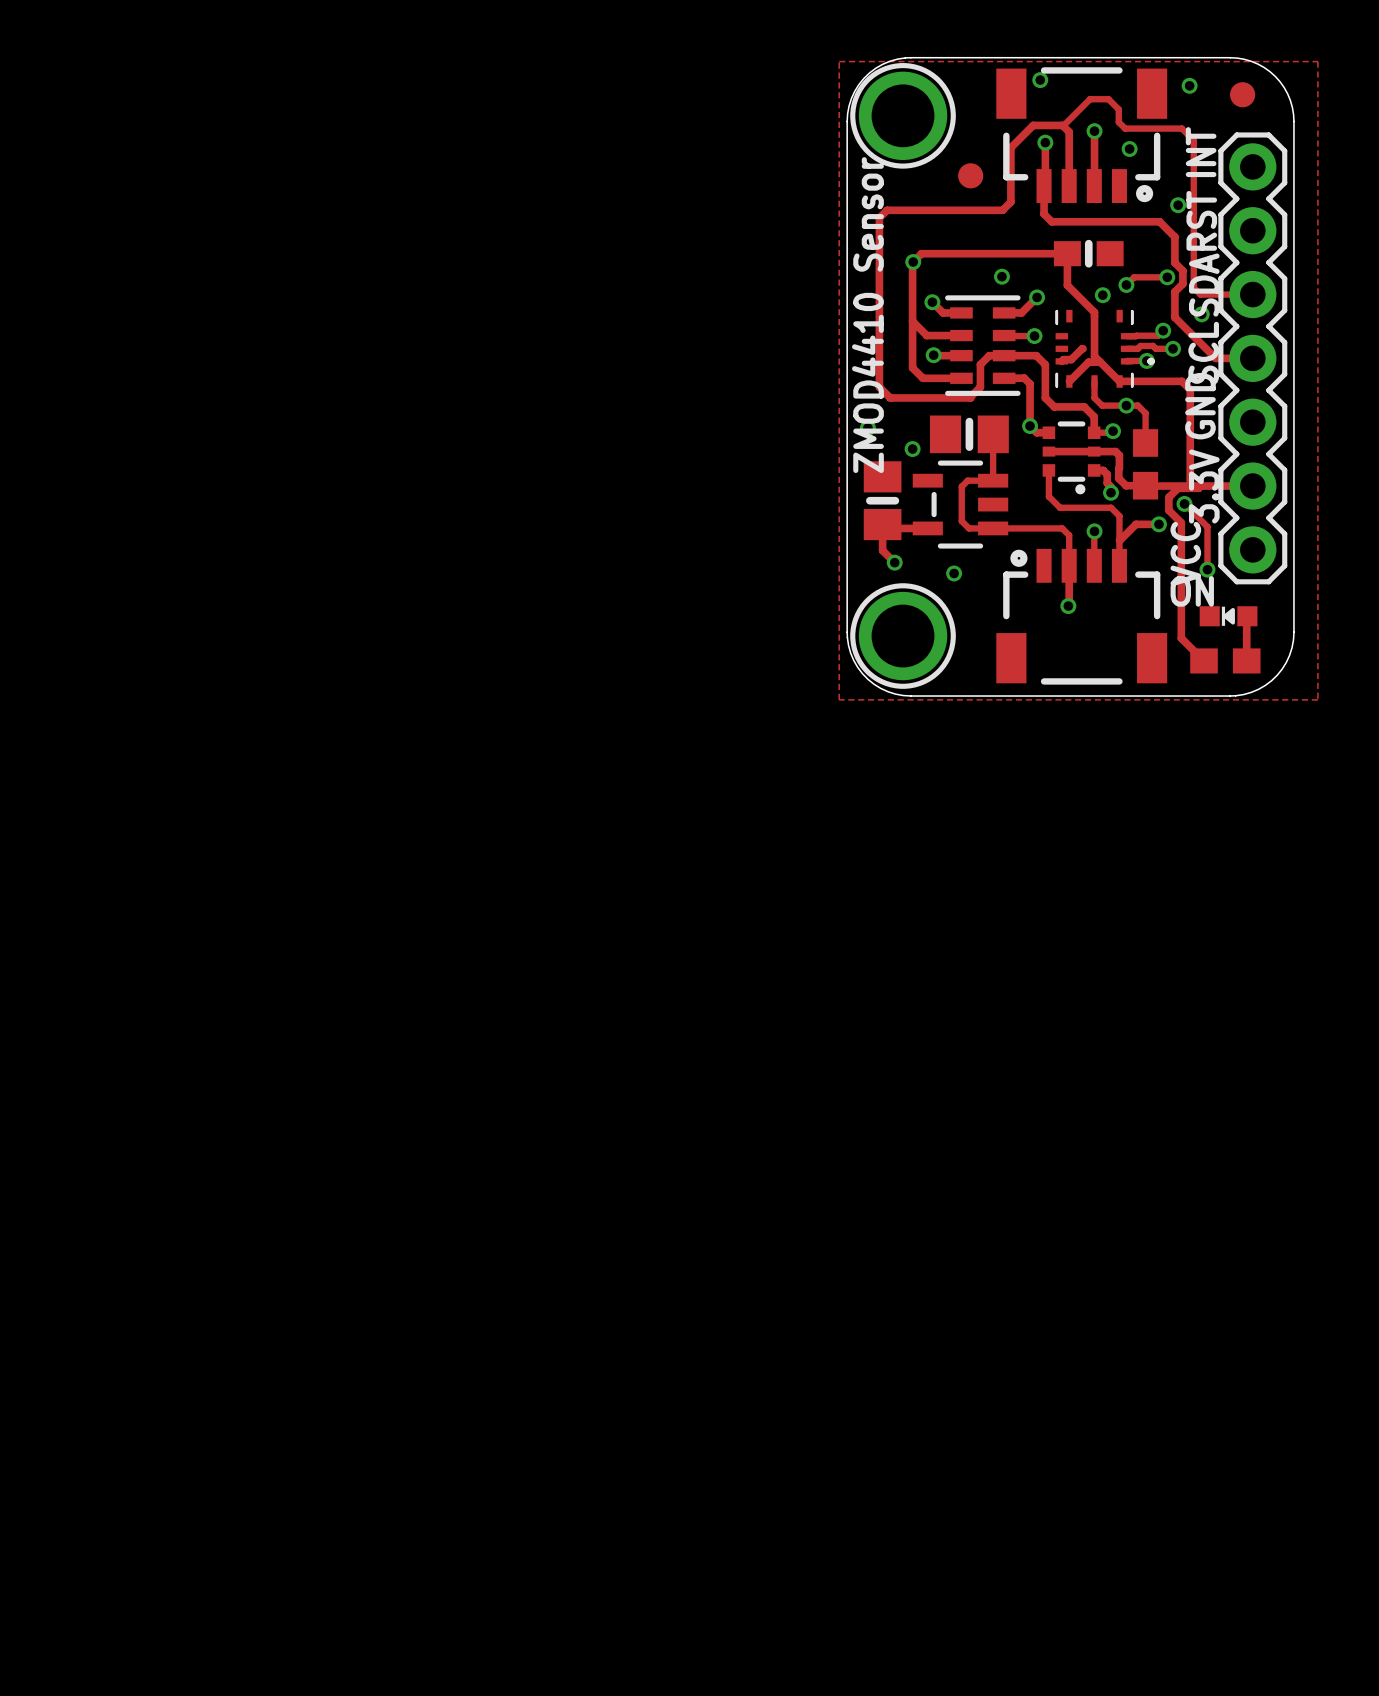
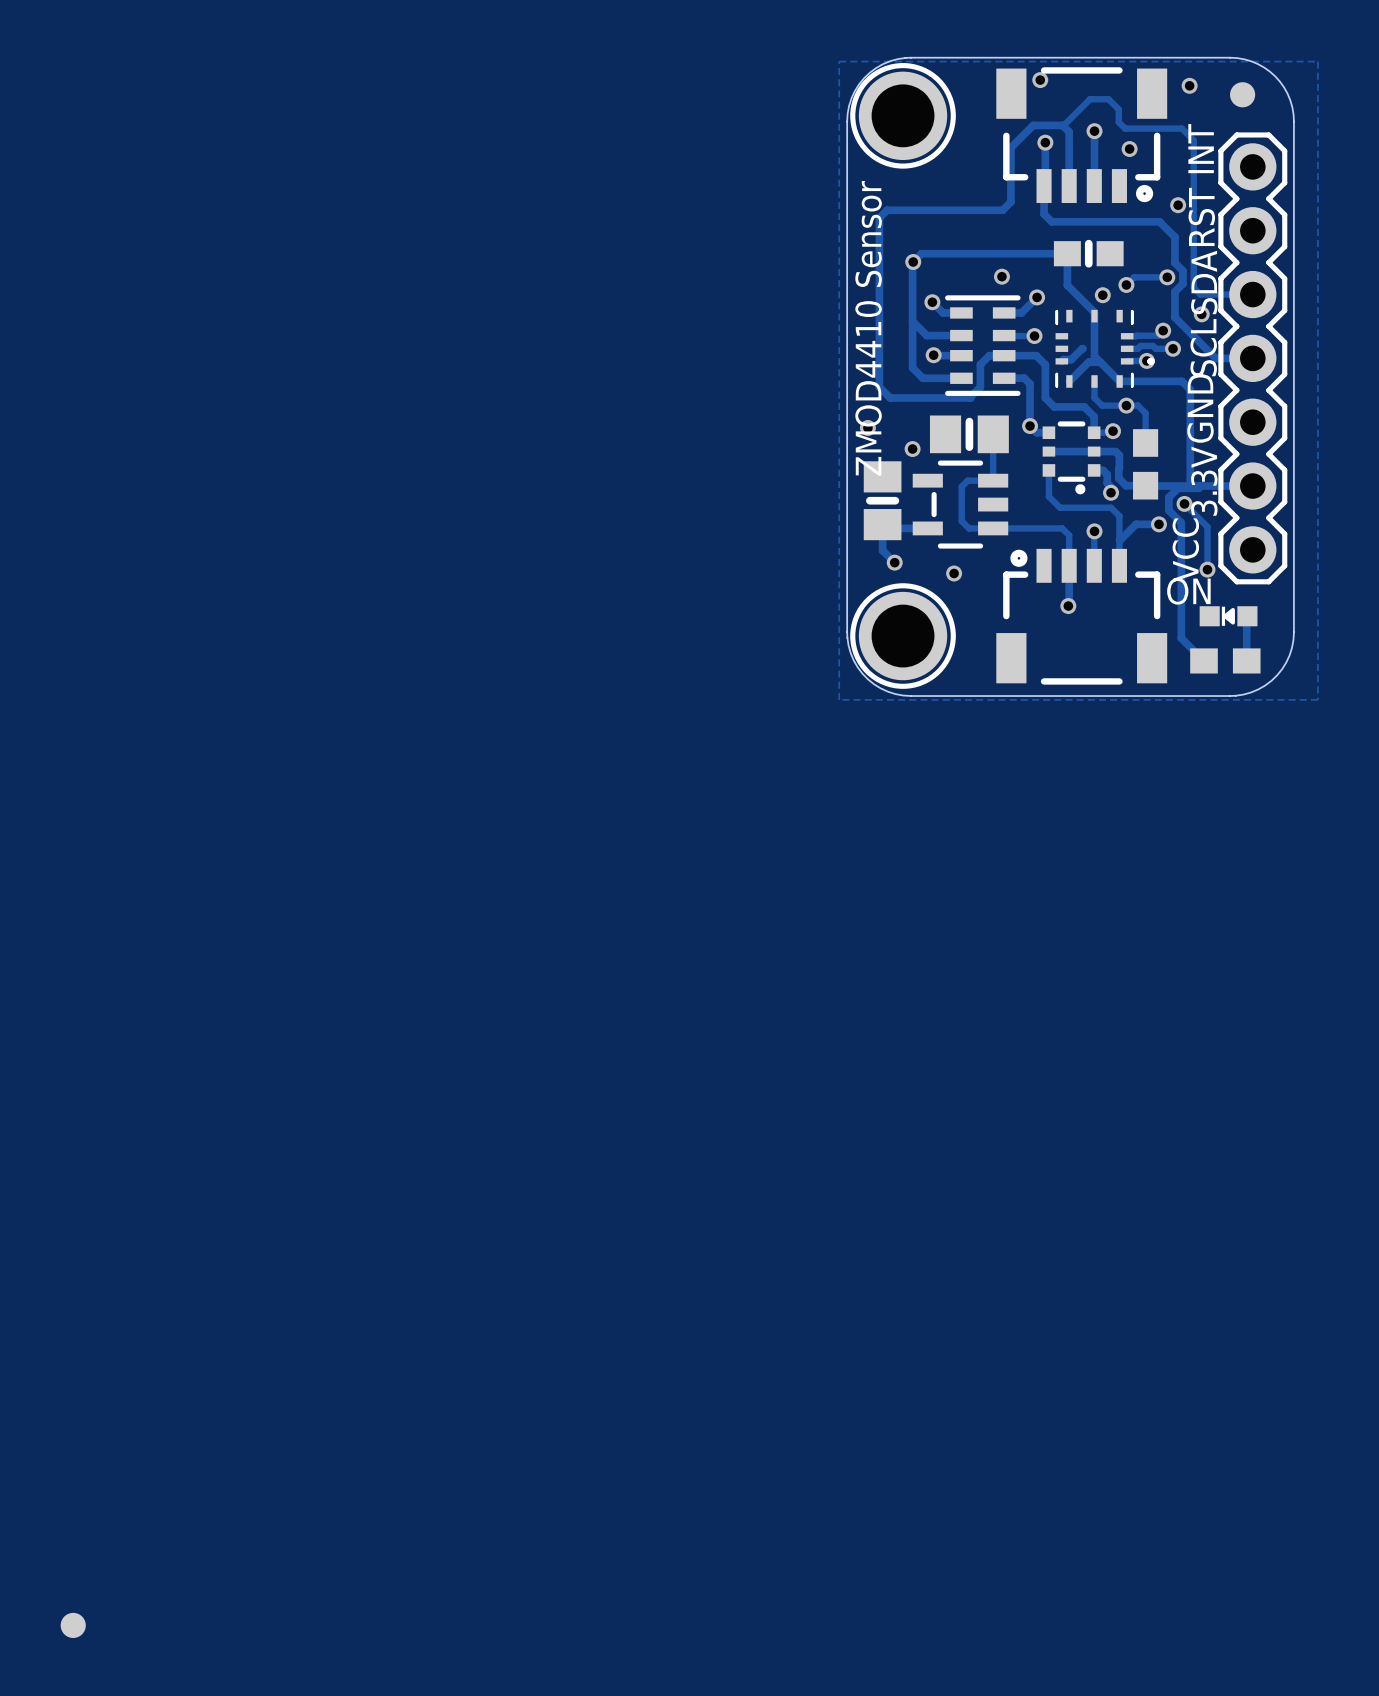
part: (970, 175) -> none
part: none -> (73, 1625)

